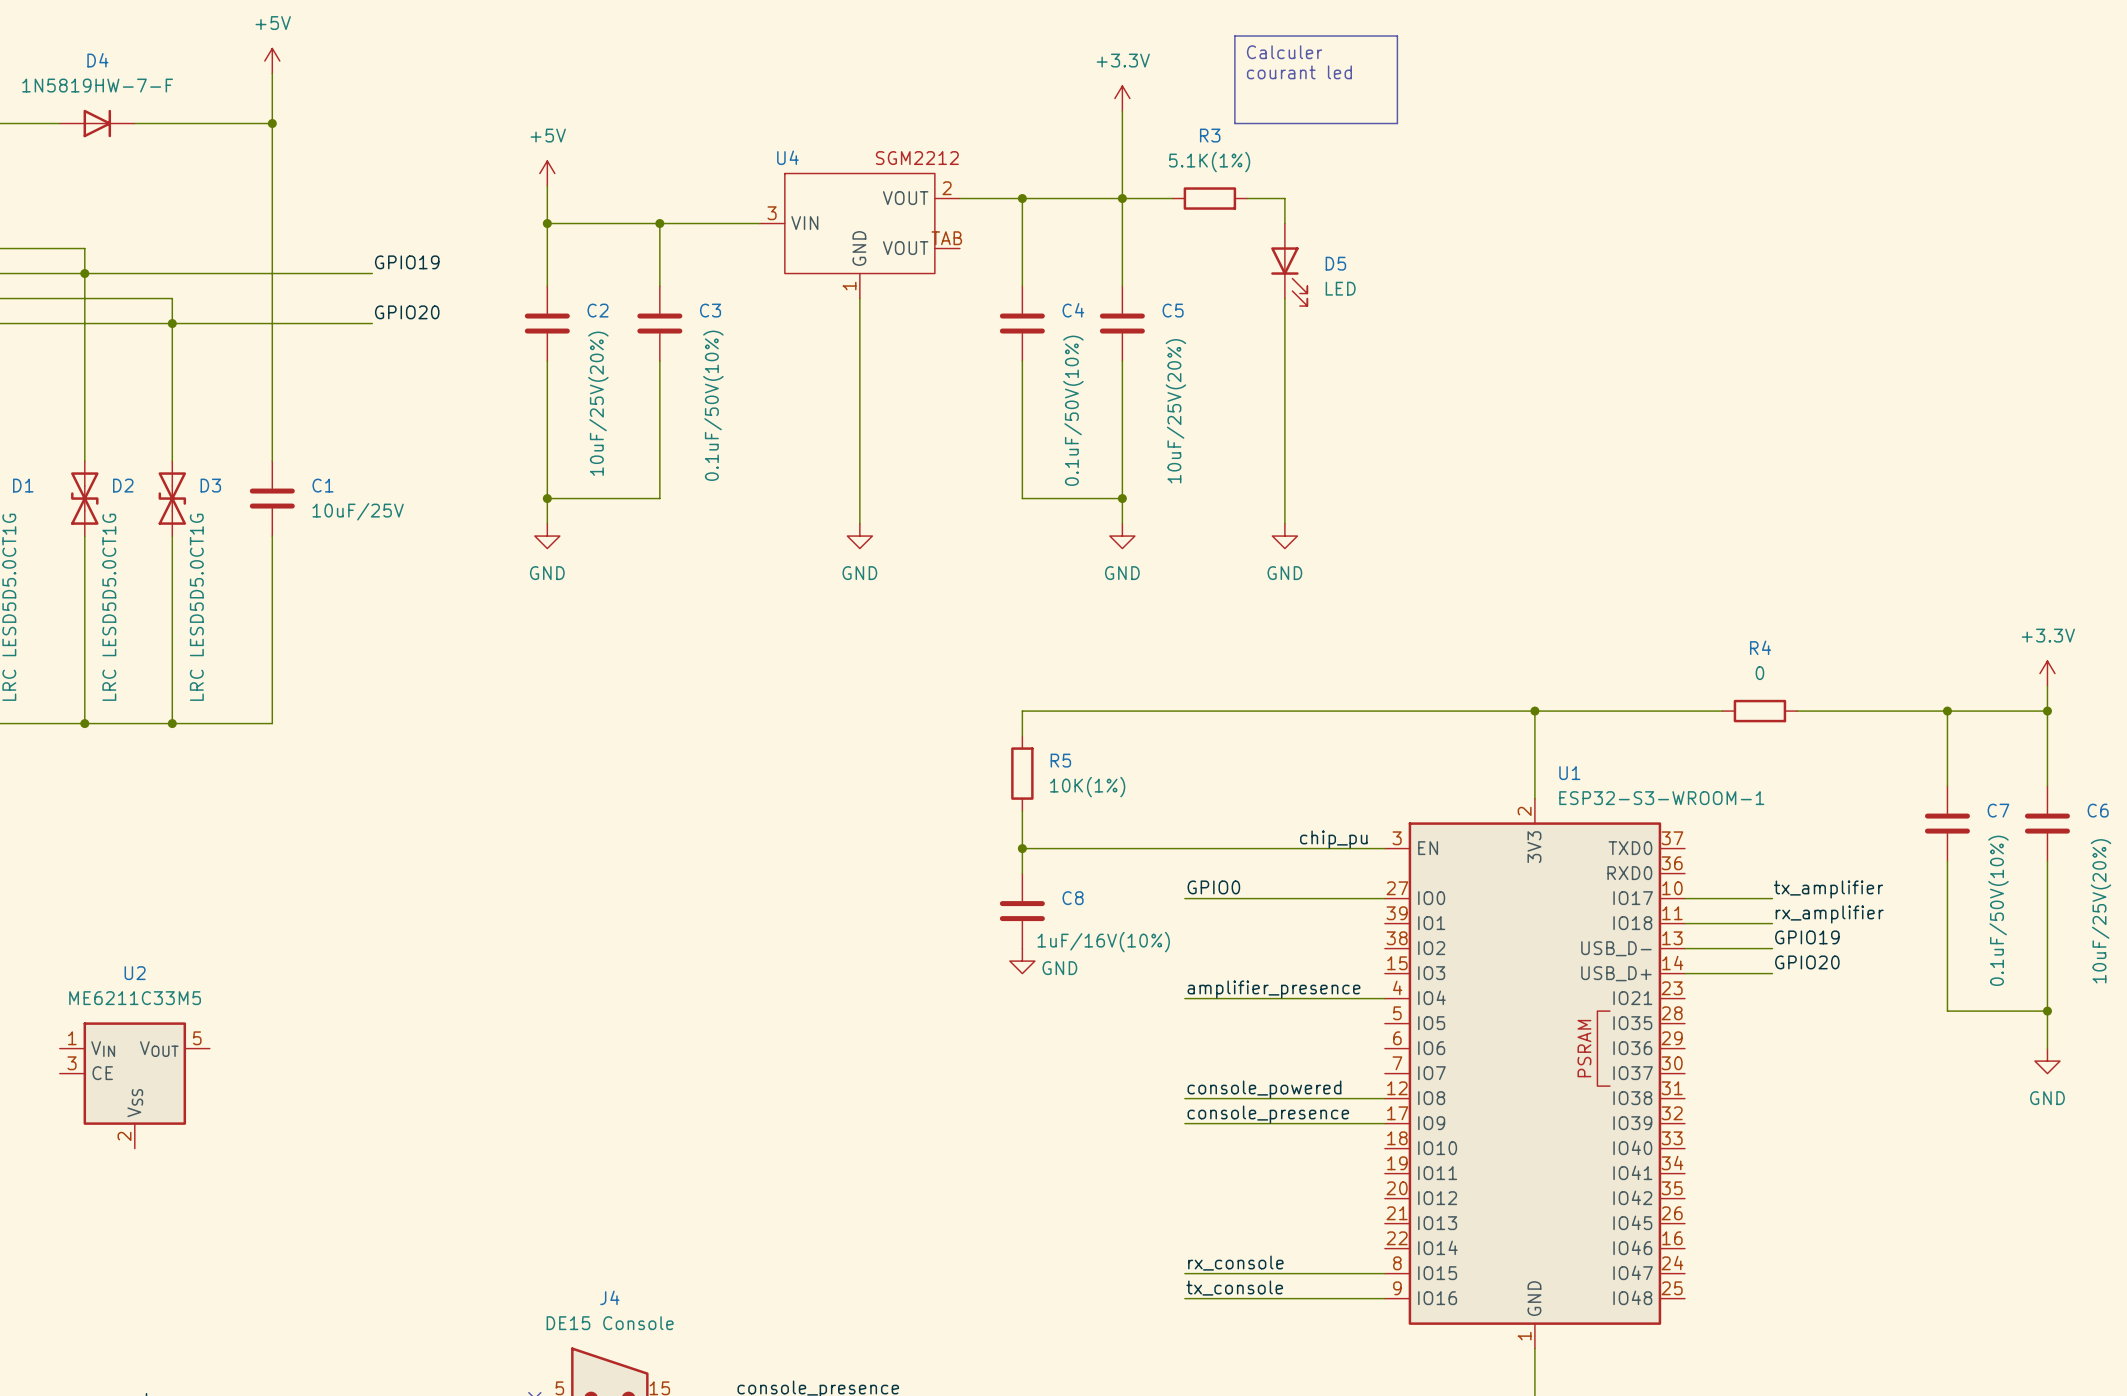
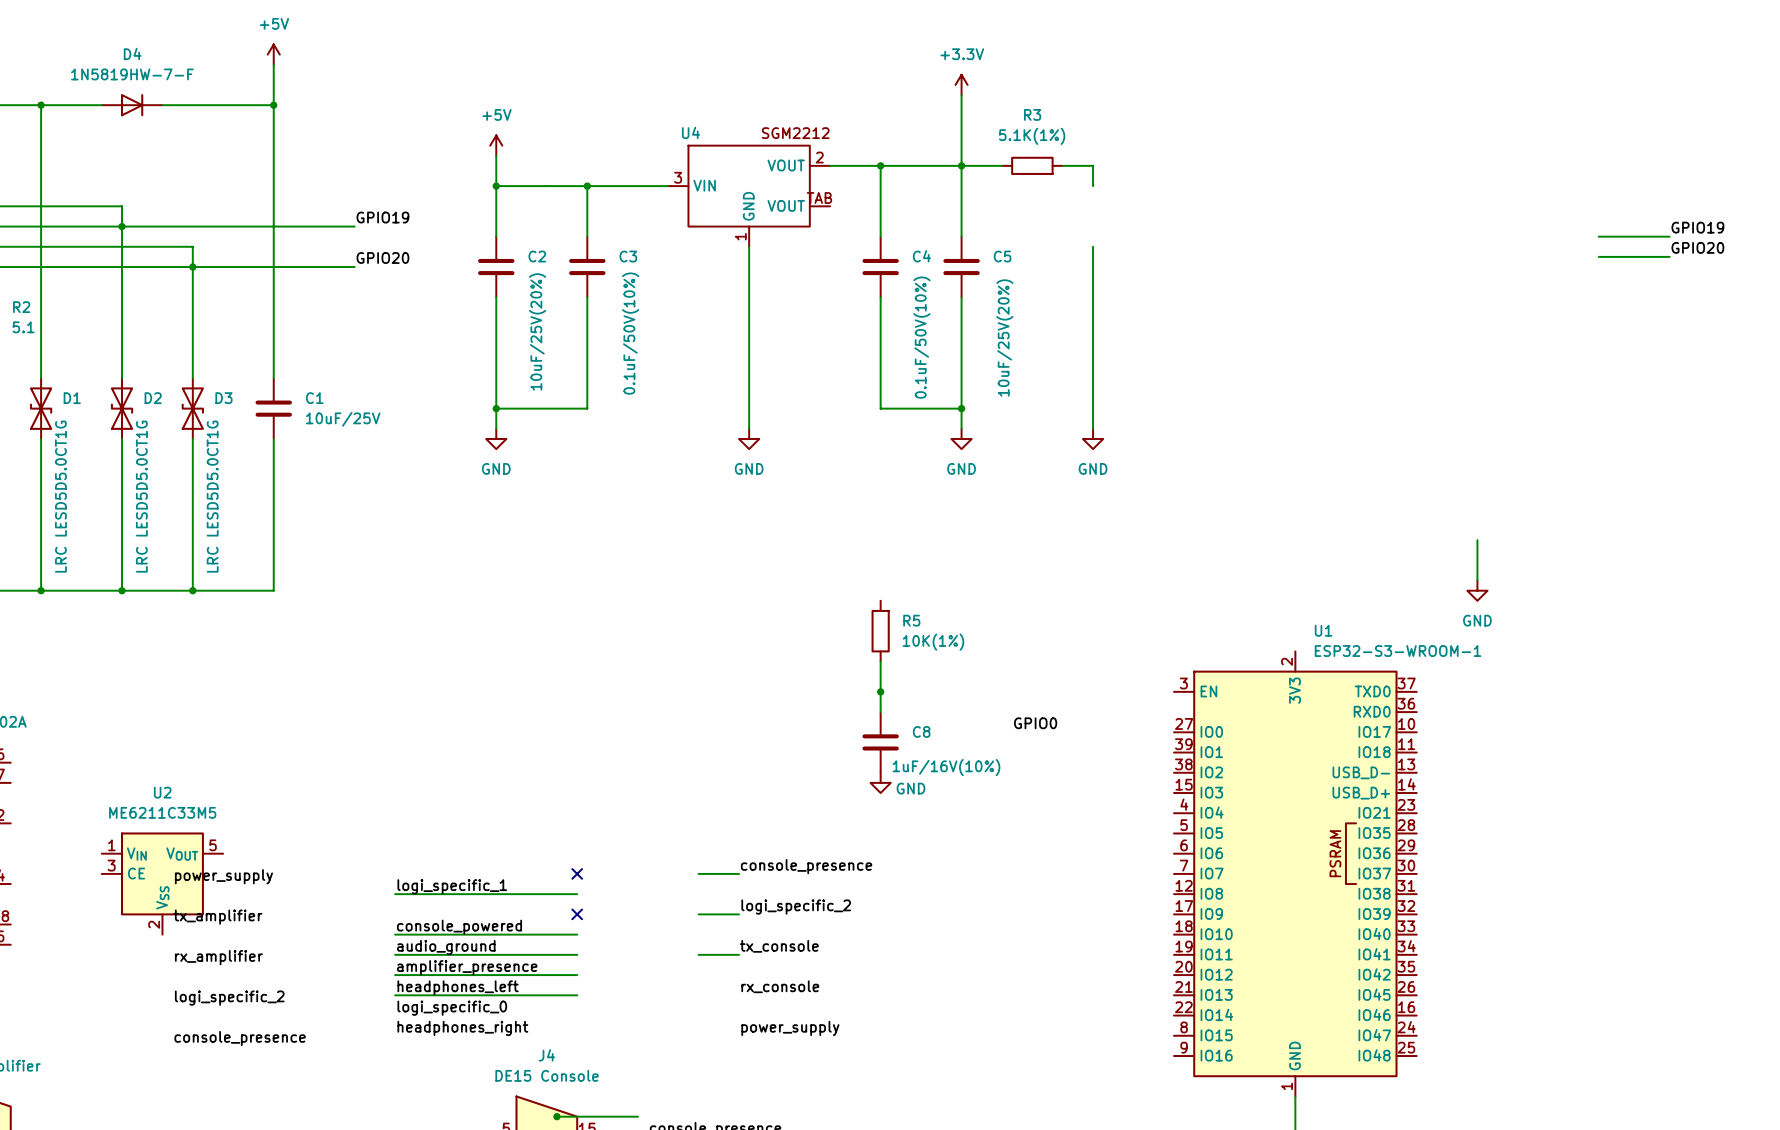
line: (1234, 36) (1397, 36) (1397, 123) (1234, 123) (1234, 36) -> none
text: Calculer (1284, 52) -> none
text: courant led (1299, 72) -> none
D5: LED (1289, 264) -> none
label: none -> GPIO19 (1697, 227)
wire: none -> (1598, 236) (1669, 236)
label: none -> GPIO20 (1697, 247)
wire: none -> (1598, 256) (1669, 256)
wire: none -> (1477, 540) (1477, 580)
power symbol: +3.3V (2047, 673) -> none
wire: (2047, 686) (2047, 786) -> none
wire: (1534, 711) (1534, 798) -> none
junction: (1534, 711) -> none
wire: (1722, 711) (1022, 711) (1022, 736) -> none
R4: 0 (1759, 711) -> none
wire: (1797, 711) (2047, 711) -> none
wire: (1947, 711) (1947, 786) -> none
junction: (1947, 711) -> none
junction: (2047, 711) -> none
power symbol: none -> GND (1477, 590)
C7: 0.1uF/50V(10%) (1947, 823) -> none
C6: 10uF/25V(20%) (2047, 823) -> none
label: chip_pu (1333, 839) -> none
wire: (1022, 848) (1384, 848) -> none
wire: (1947, 861) (1947, 1011) (2047, 1011) -> none
wire: (2047, 861) (2047, 1048) -> none
label: tx_amplifier (1828, 889) -> none
wire: (1184, 898) (1384, 898) -> none
wire: (1684, 898) (1772, 898) -> none
label: rx_amplifier (1829, 914) -> none
wire: (1684, 923) (1772, 923) -> none
label: GPIO19 (1807, 937) -> none
wire: (1684, 948) (1772, 948) -> none
label: GPIO20 (1807, 962) -> none
wire: (1684, 973) (1772, 973) -> none
label: amplifier_presence (1273, 989) -> none
wire: (1184, 998) (1384, 998) -> none
junction: (2047, 1011) -> none
power symbol: GND (2047, 1061) -> none
label: none -> console_presence (806, 866)
no-connect mark: none -> (577, 873)
wire: none -> (698, 873) (739, 873)
label: none -> power_supply (223, 876)
label: none -> logi_specific_1 (452, 886)
label: console_powered (1264, 1089) -> none
wire: none -> (395, 894) (577, 894)
wire: (1184, 1098) (1384, 1098) -> none
label: none -> logi_specific_2 (796, 907)
label: console_presence (1268, 1114) -> none
no-connect mark: none -> (577, 914)
wire: none -> (698, 914) (739, 914)
wire: (1184, 1123) (1384, 1123) -> none
label: none -> tx_amplifier (217, 917)
label: none -> console_powered (459, 927)
wire: none -> (395, 934) (577, 934)
label: none -> tx_console (779, 946)
label: none -> audio_ground (446, 947)
wire: none -> (395, 954) (577, 954)
wire: none -> (698, 954) (739, 954)
label: none -> rx_amplifier (218, 957)
label: none -> amplifier_presence (467, 967)
wire: none -> (395, 975) (577, 975)
label: none -> rx_console (780, 986)
label: none -> headphones_left (458, 987)
wire: none -> (395, 995) (577, 995)
label: none -> logi_specific_2 (229, 998)
label: none -> logi_specific_0 (452, 1008)
label: rx_console (1235, 1263) -> none
label: none -> headphones_right (462, 1028)
label: none -> power_supply (790, 1028)
wire: (1184, 1273) (1384, 1273) -> none
label: none -> console_presence (240, 1038)
label: tx_console (1234, 1288) -> none
wire: (1184, 1298) (1384, 1298) -> none
wire: none -> (556, 1116) (637, 1116)
junction: none -> (556, 1116)

